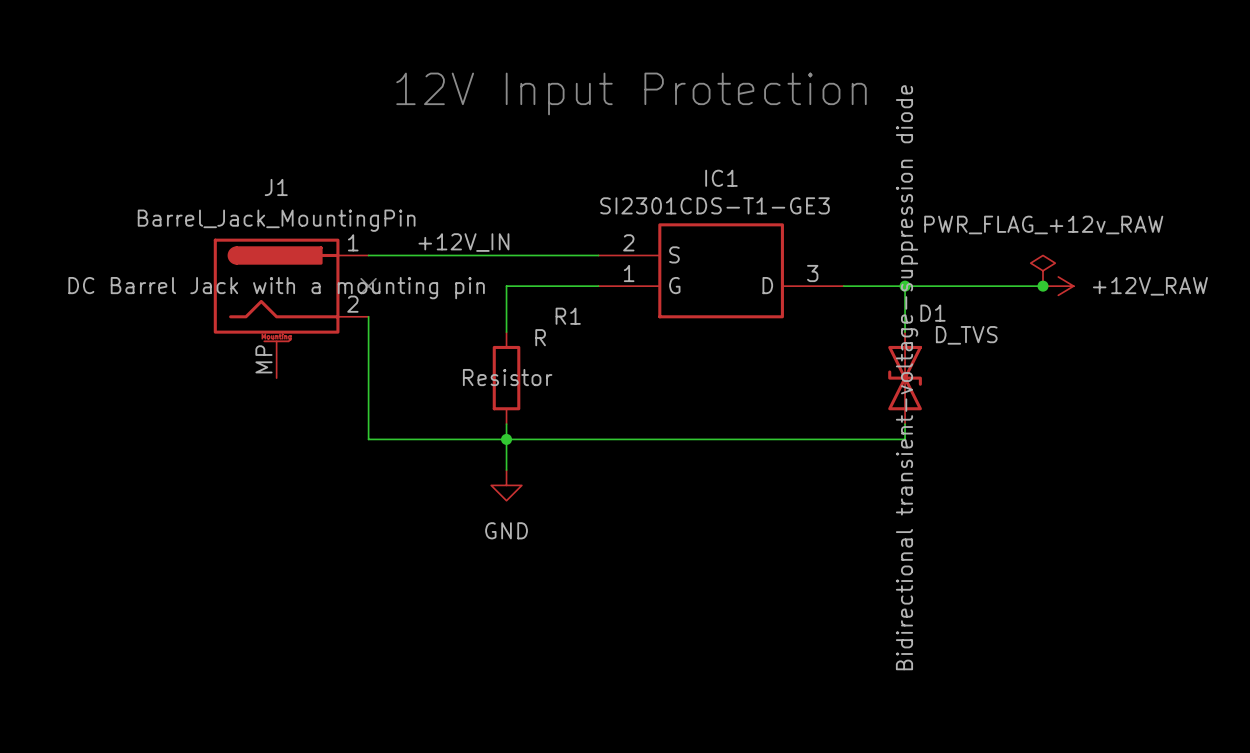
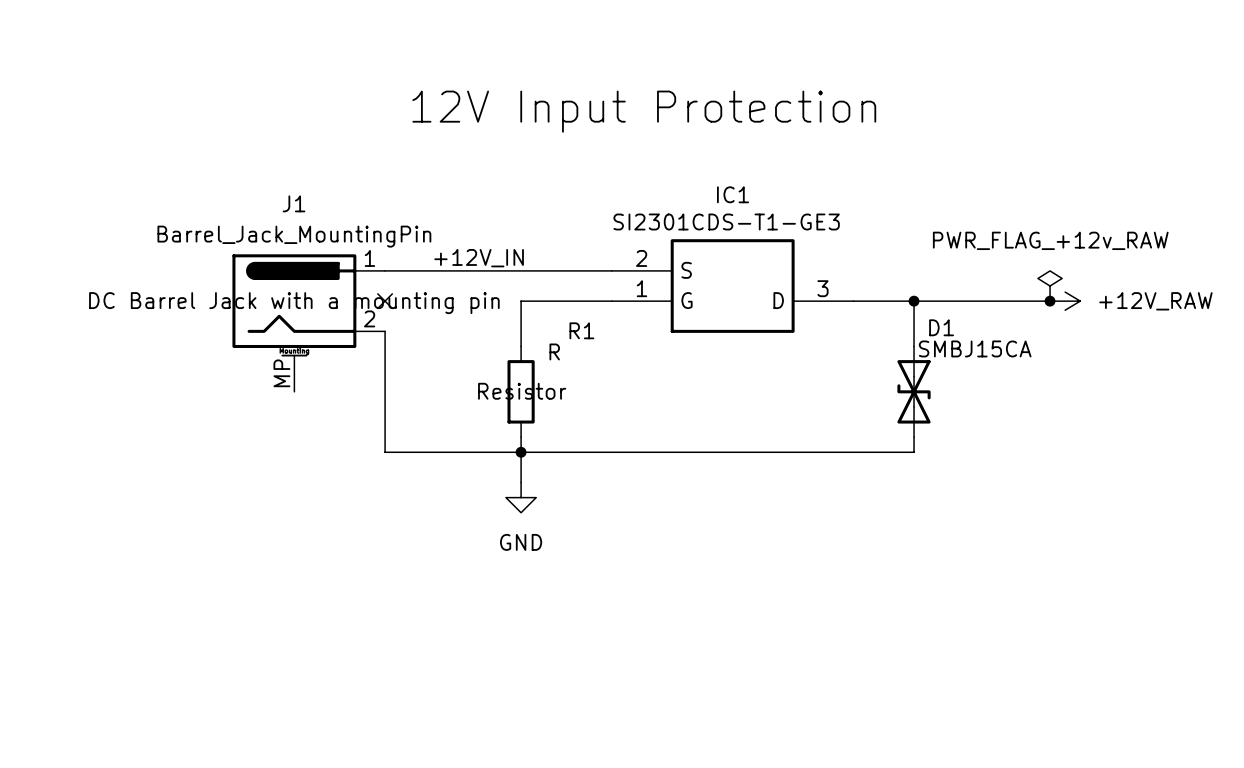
D1 value: D_TVS (966, 335) -> SMBJ15CA (975, 348)
D1 text: Bidirectional transient-voltage-suppression diode (907, 377) -> none

